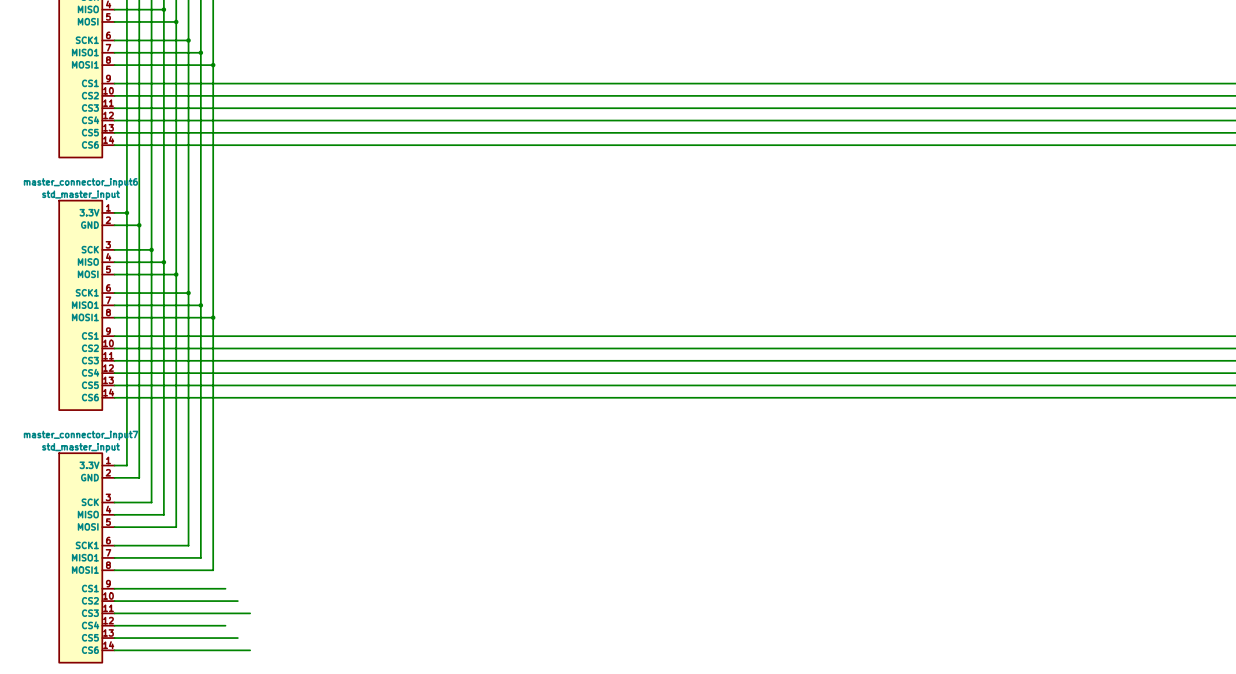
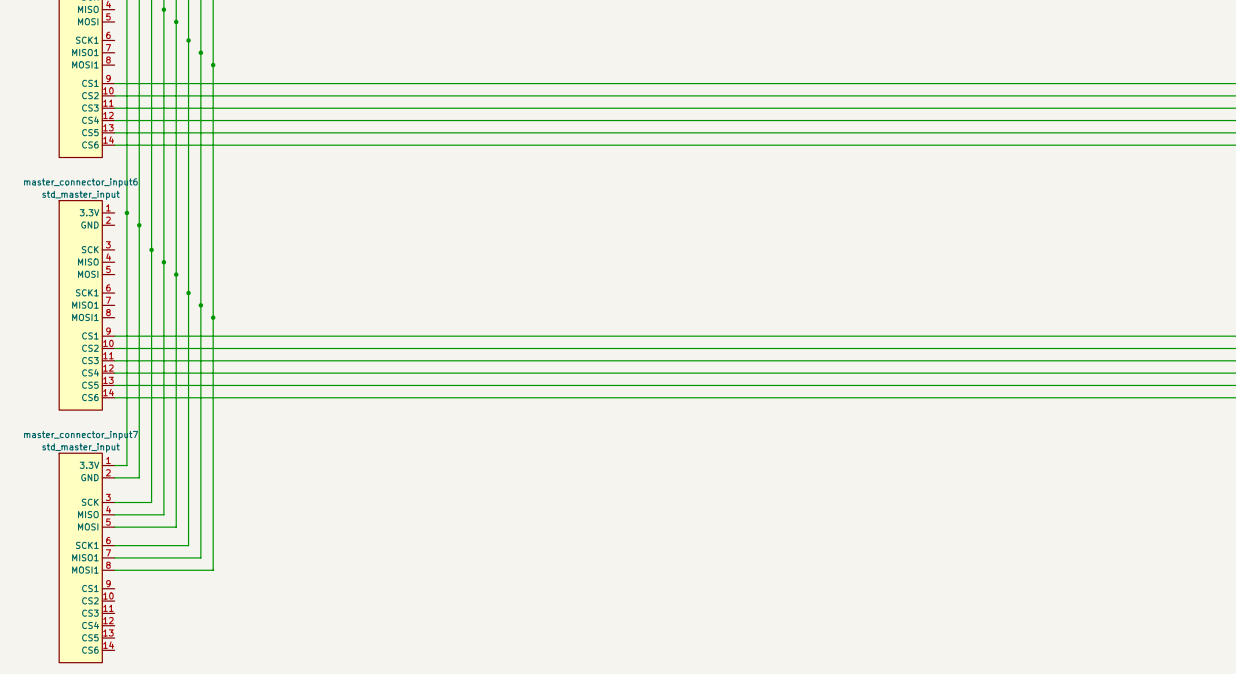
wire: (114, 9) (163, 9) -> none
wire: (114, 21) (176, 21) -> none
wire: (114, 40) (188, 40) -> none
wire: (114, 52) (200, 52) -> none
wire: (114, 65) (213, 65) -> none
wire: (114, 212) (126, 212) -> none
wire: (114, 225) (139, 225) -> none
wire: (114, 249) (151, 249) -> none
wire: (114, 262) (163, 262) -> none
wire: (114, 274) (176, 274) -> none
wire: (114, 293) (188, 293) -> none
wire: (114, 305) (200, 305) -> none
wire: (114, 317) (213, 317) -> none
wire: (114, 588) (225, 588) -> none
wire: (114, 601) (237, 601) -> none
wire: (114, 613) (250, 613) -> none
wire: (114, 625) (225, 625) -> none
wire: (114, 638) (237, 638) -> none
wire: (114, 650) (250, 650) -> none

